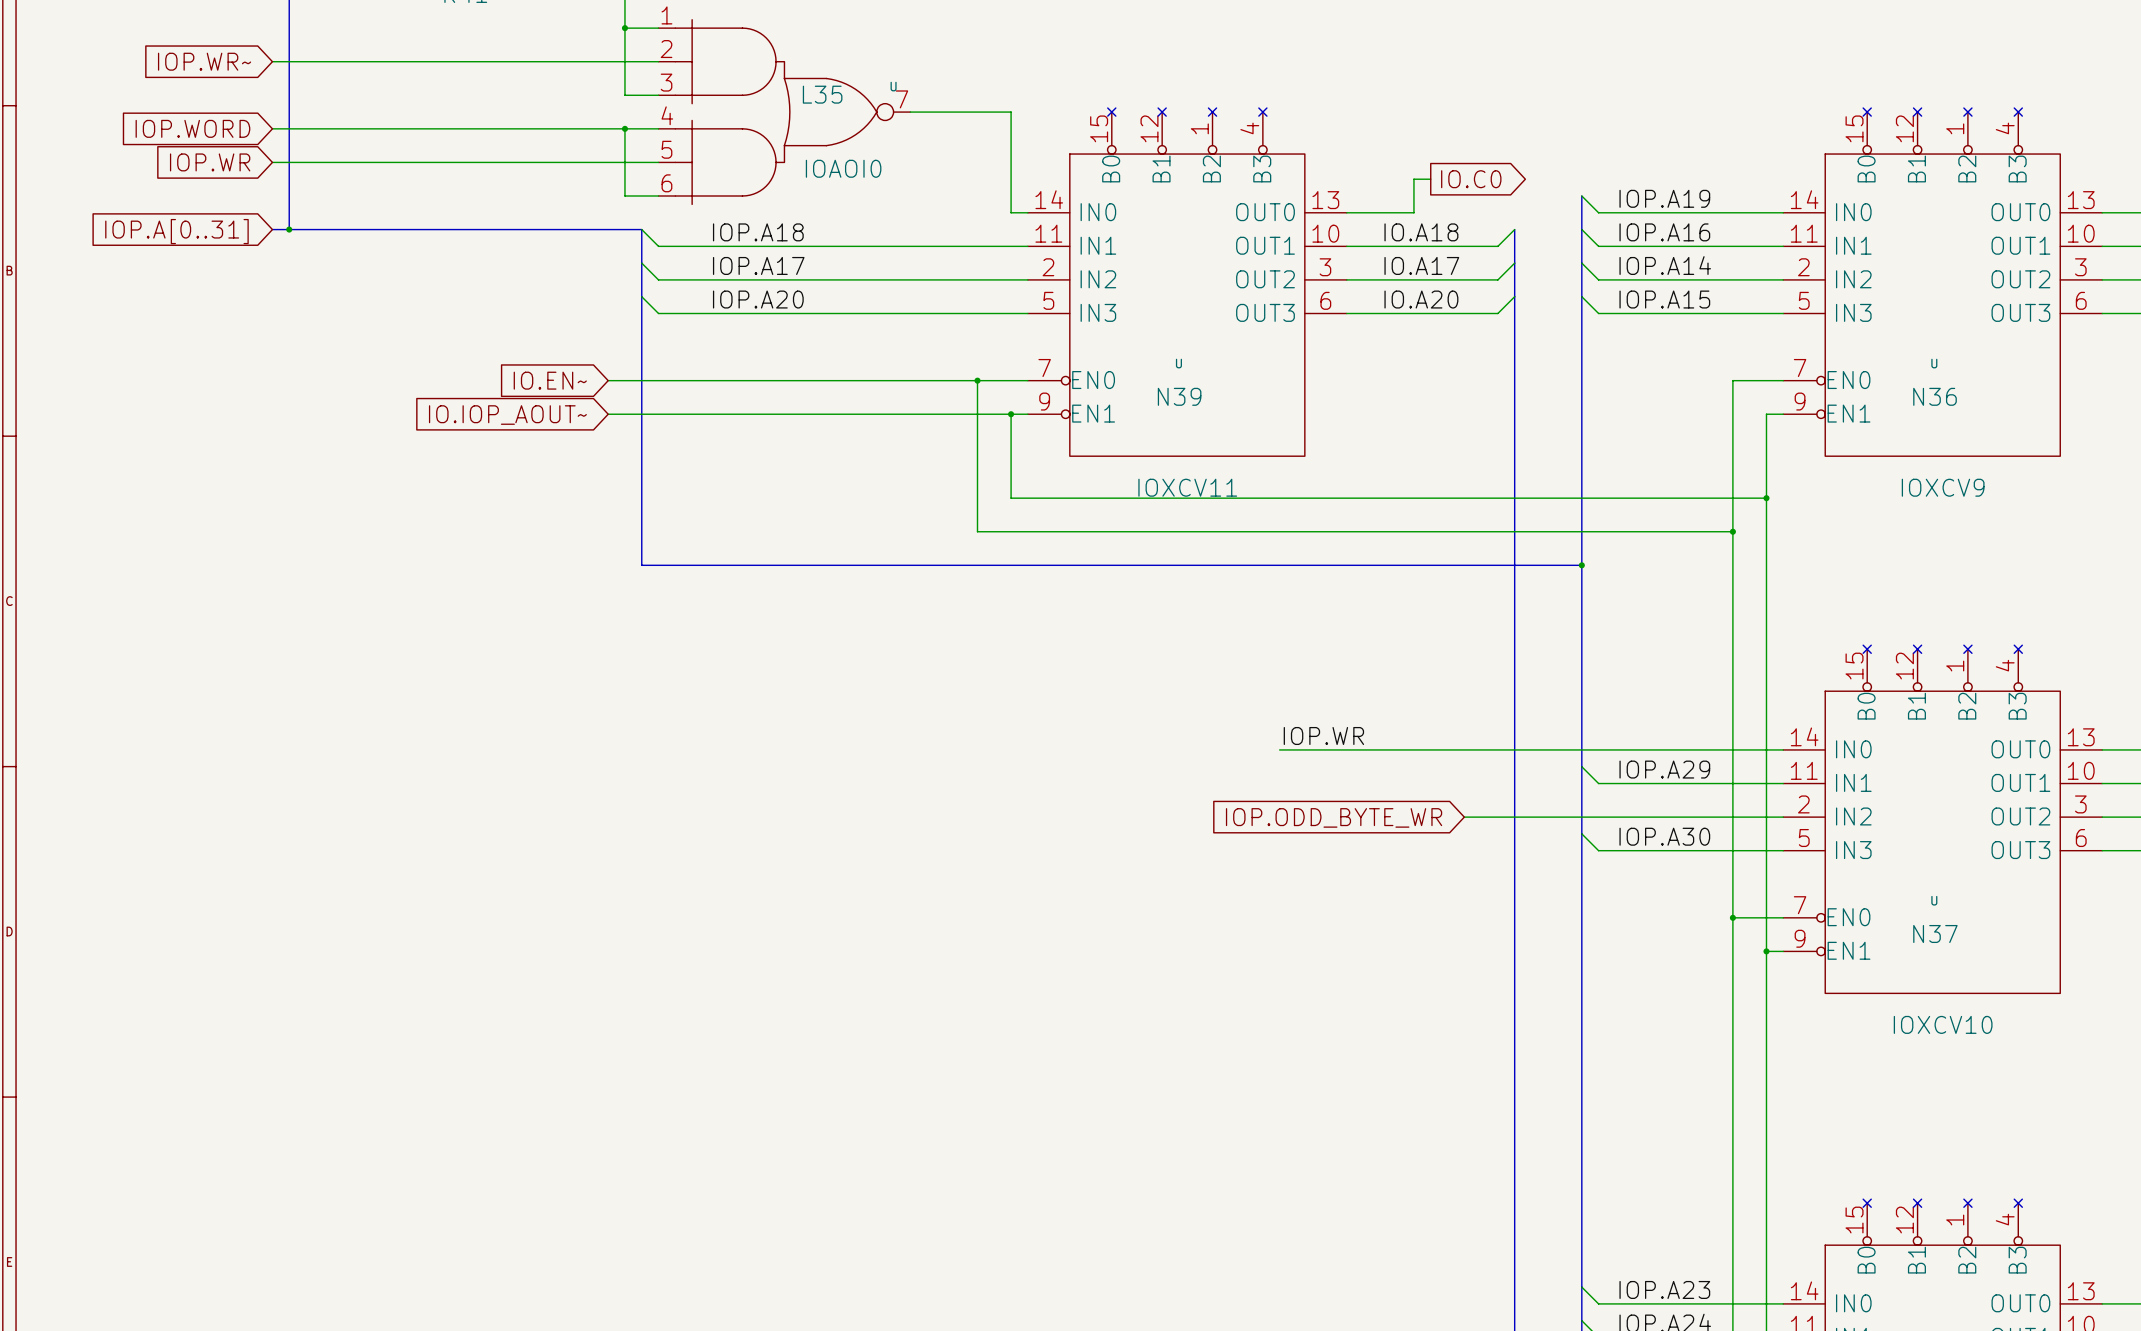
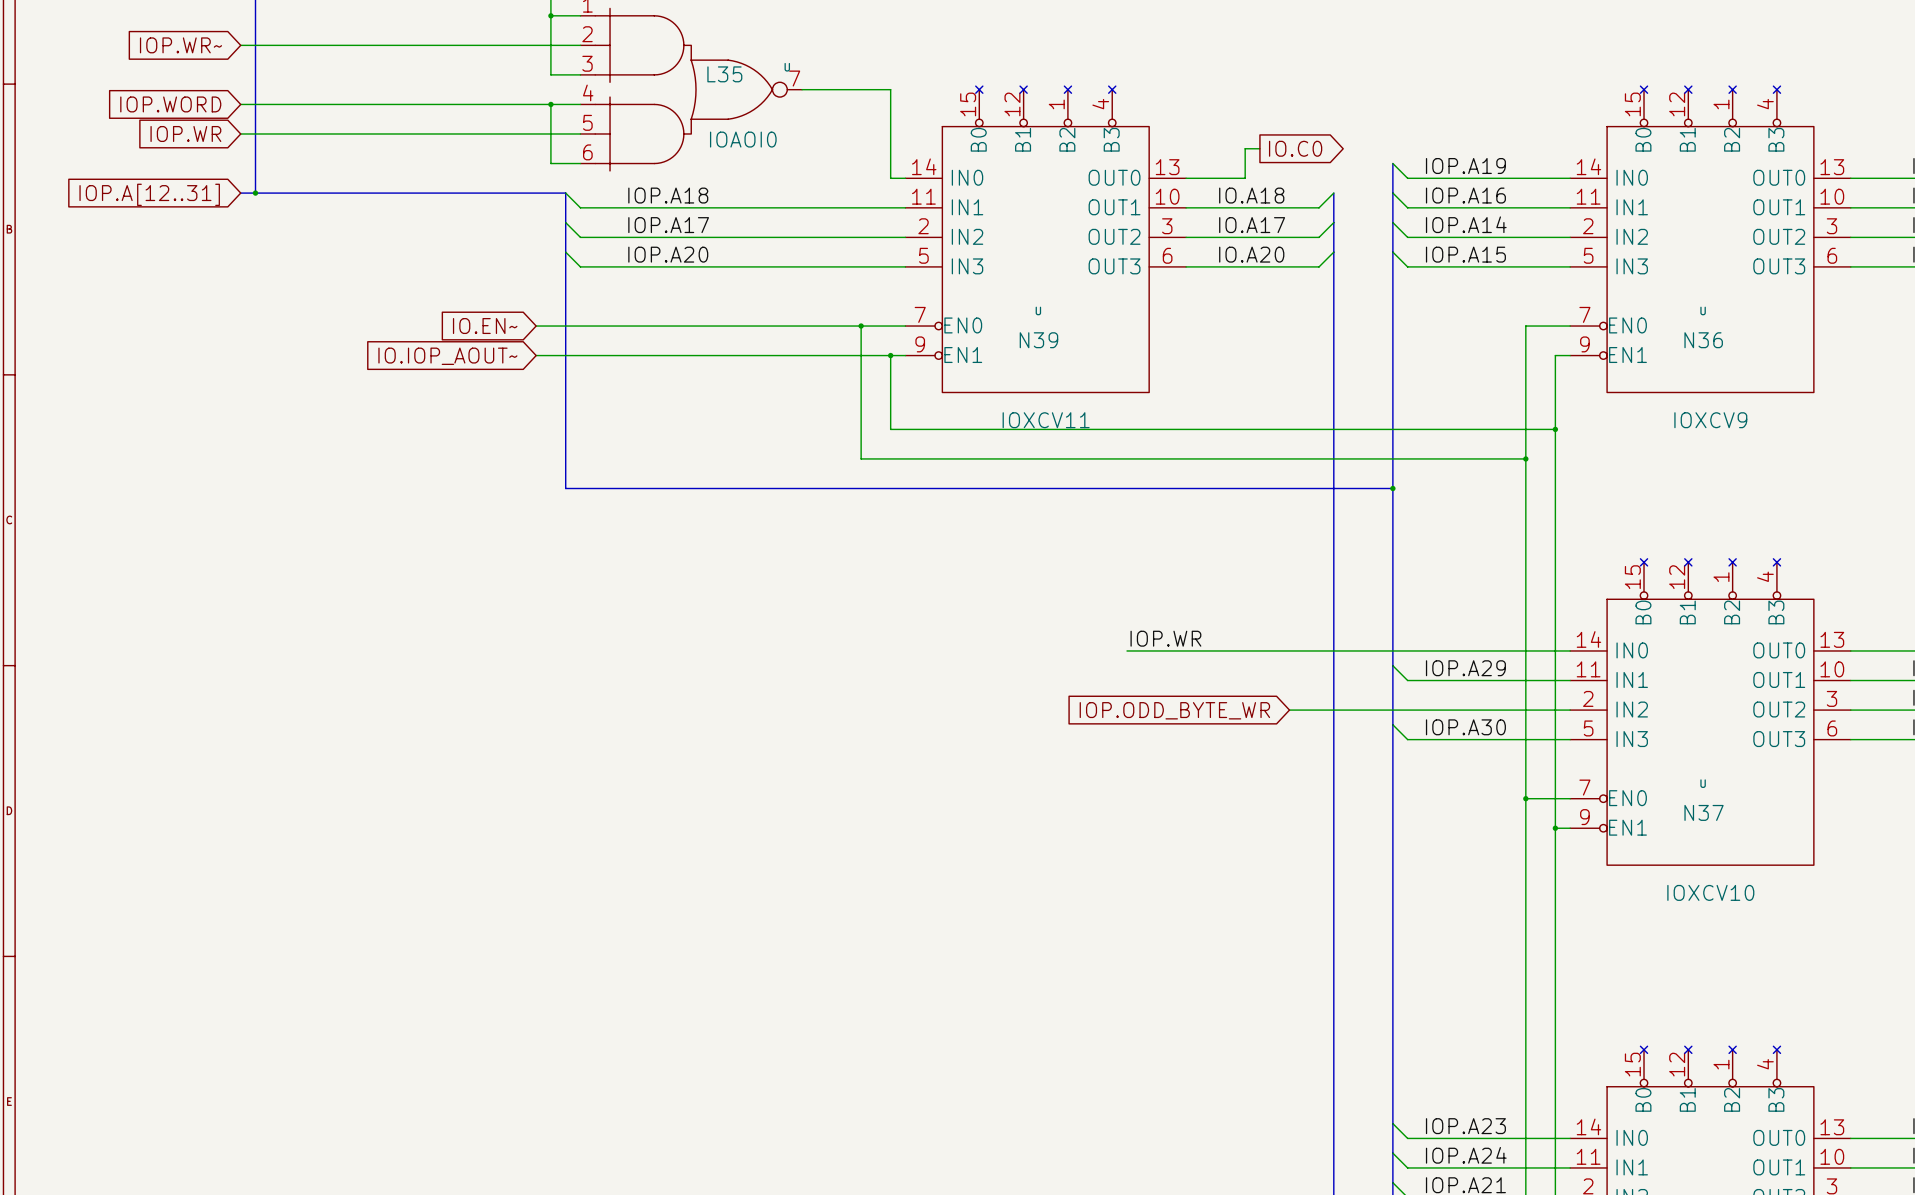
global label: IOP.A[0..31] (176, 231) -> IOP.A[12..31] (149, 194)

